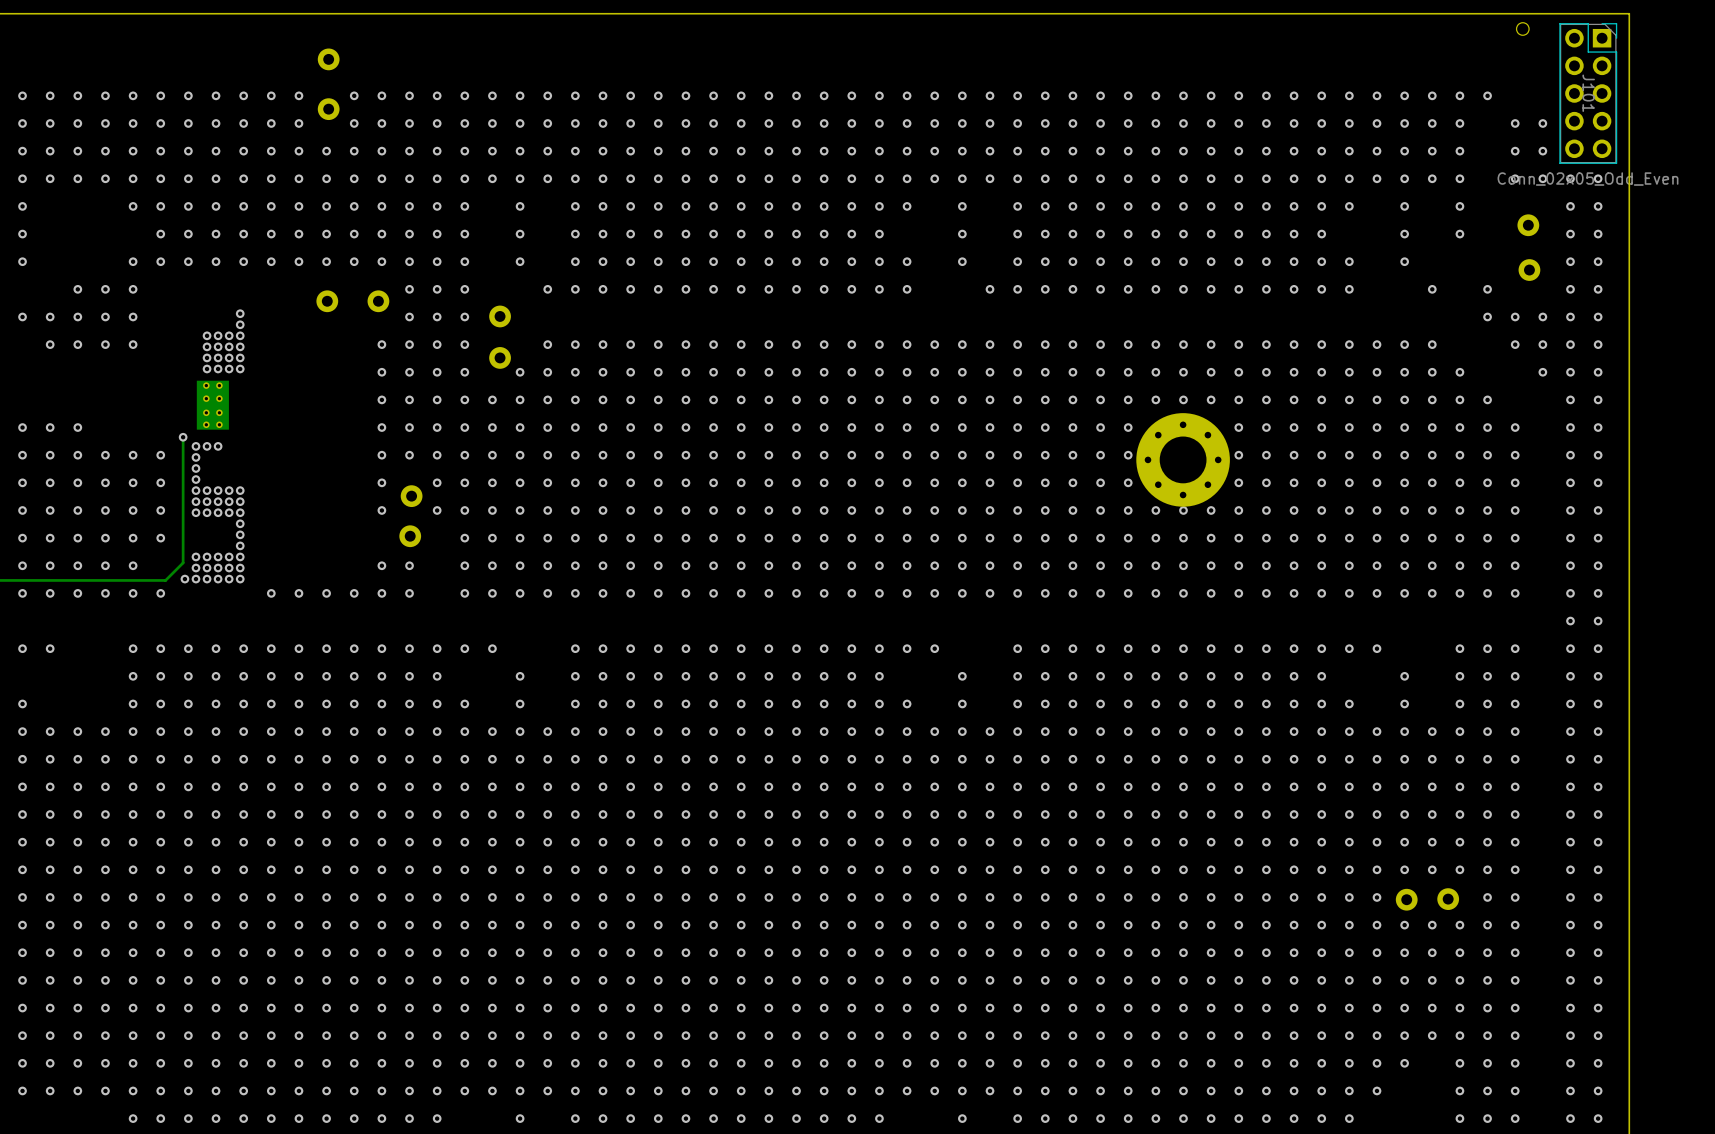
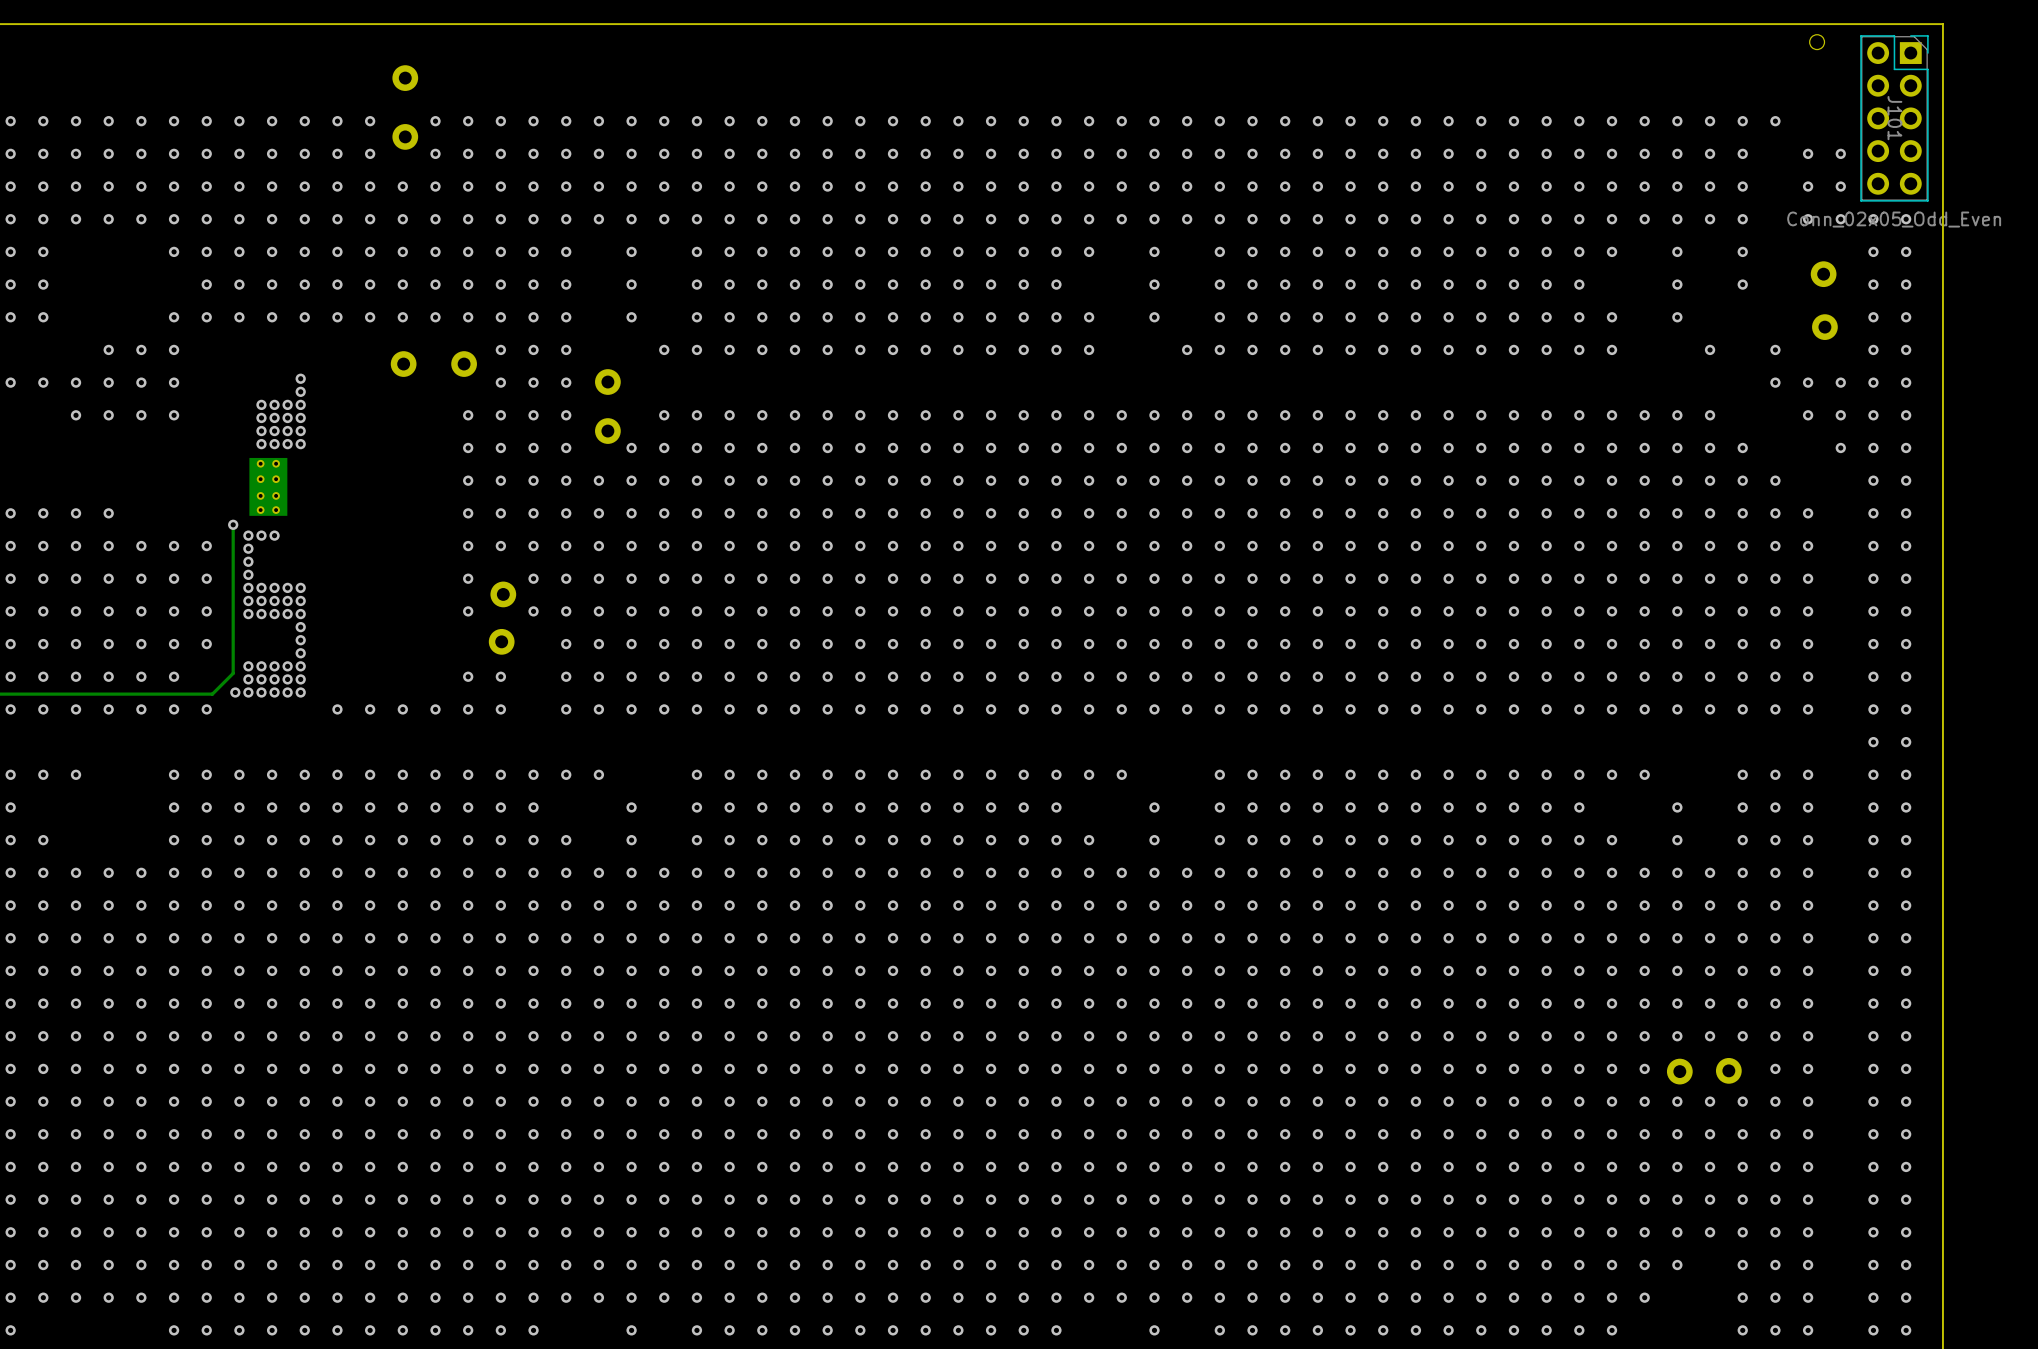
via: none -> (1383, 513)
via: none -> (1415, 513)
via: none -> (1448, 513)
via: none -> (1383, 546)
via: none -> (1415, 546)
via: none -> (1448, 546)
part: (1183, 459) -> none
via: none -> (1383, 578)
via: none -> (1415, 578)
via: none -> (1448, 578)

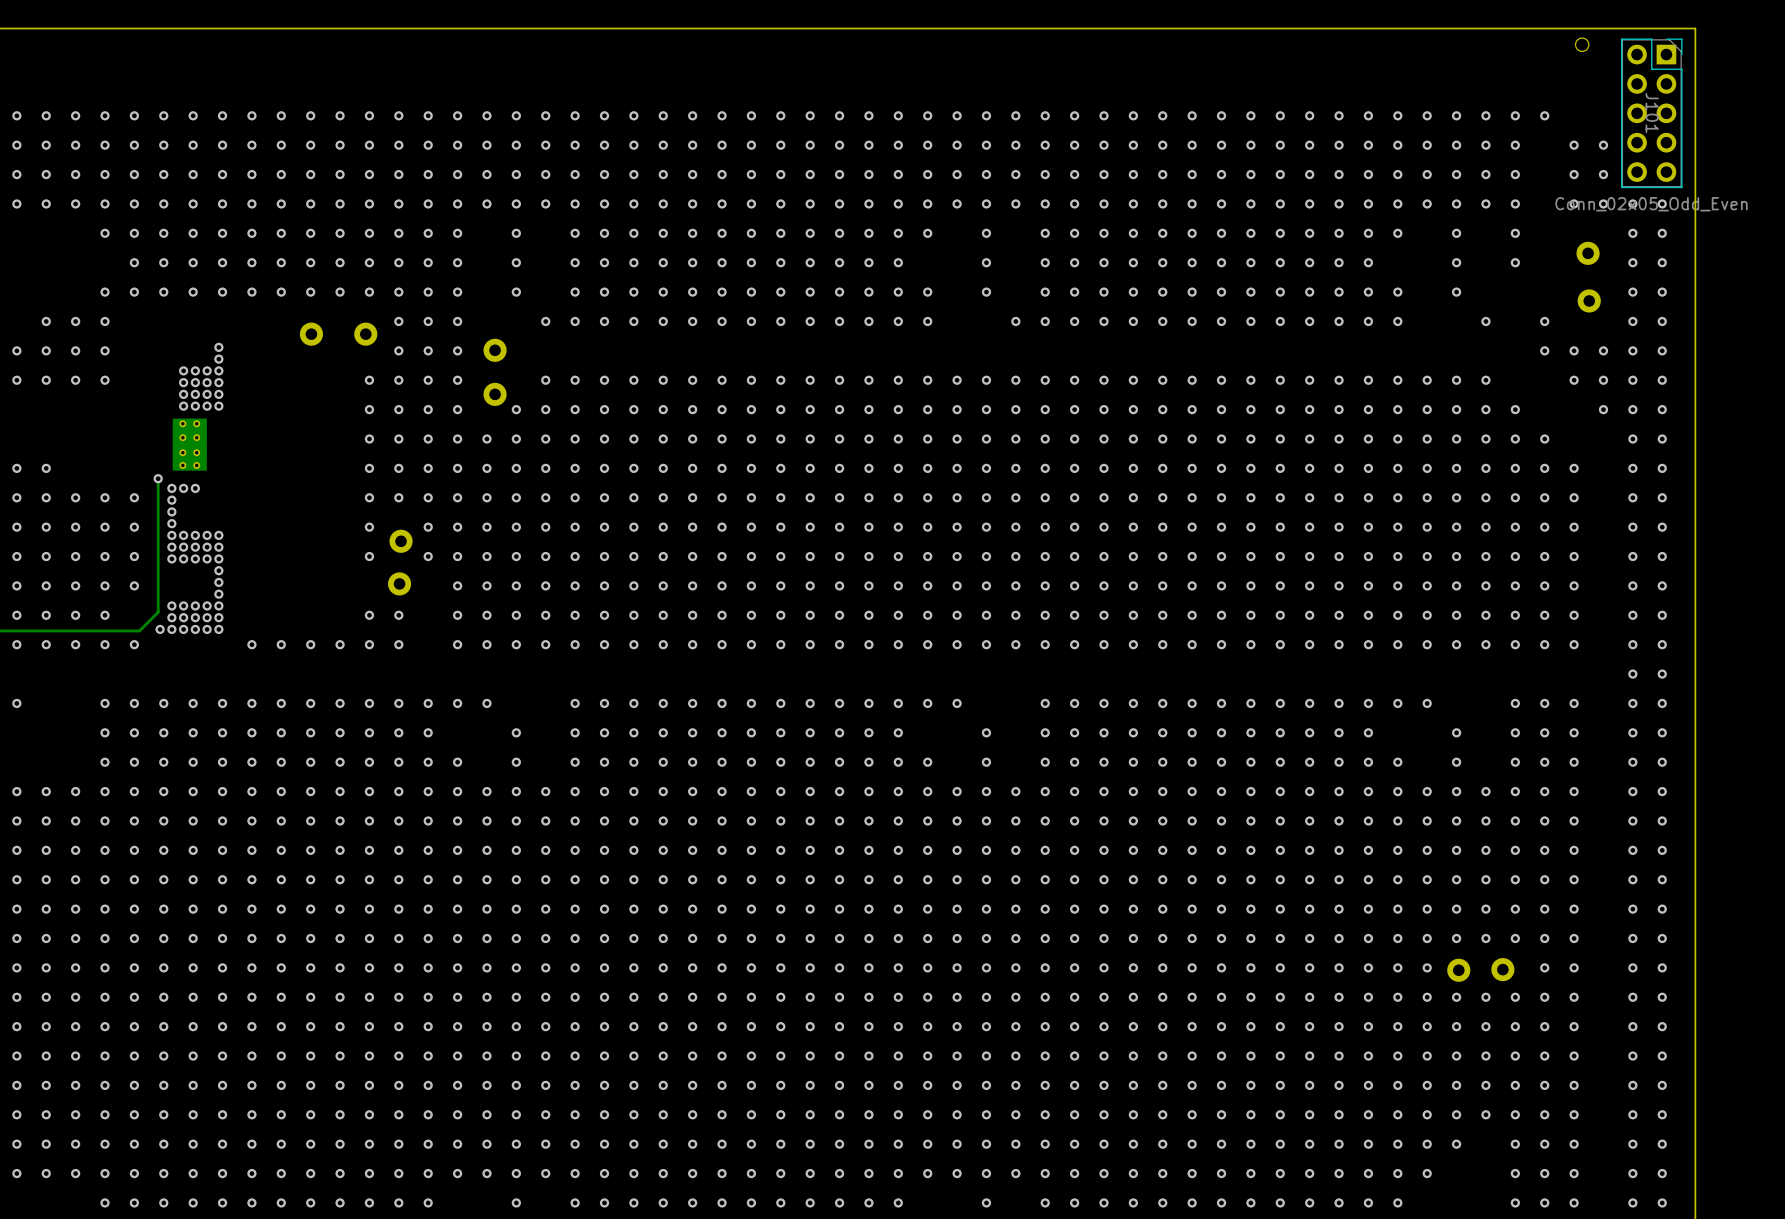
part: (405, 78) -> none
via: none -> (310, 115)
part: (405, 136) -> none
via: none -> (310, 145)

